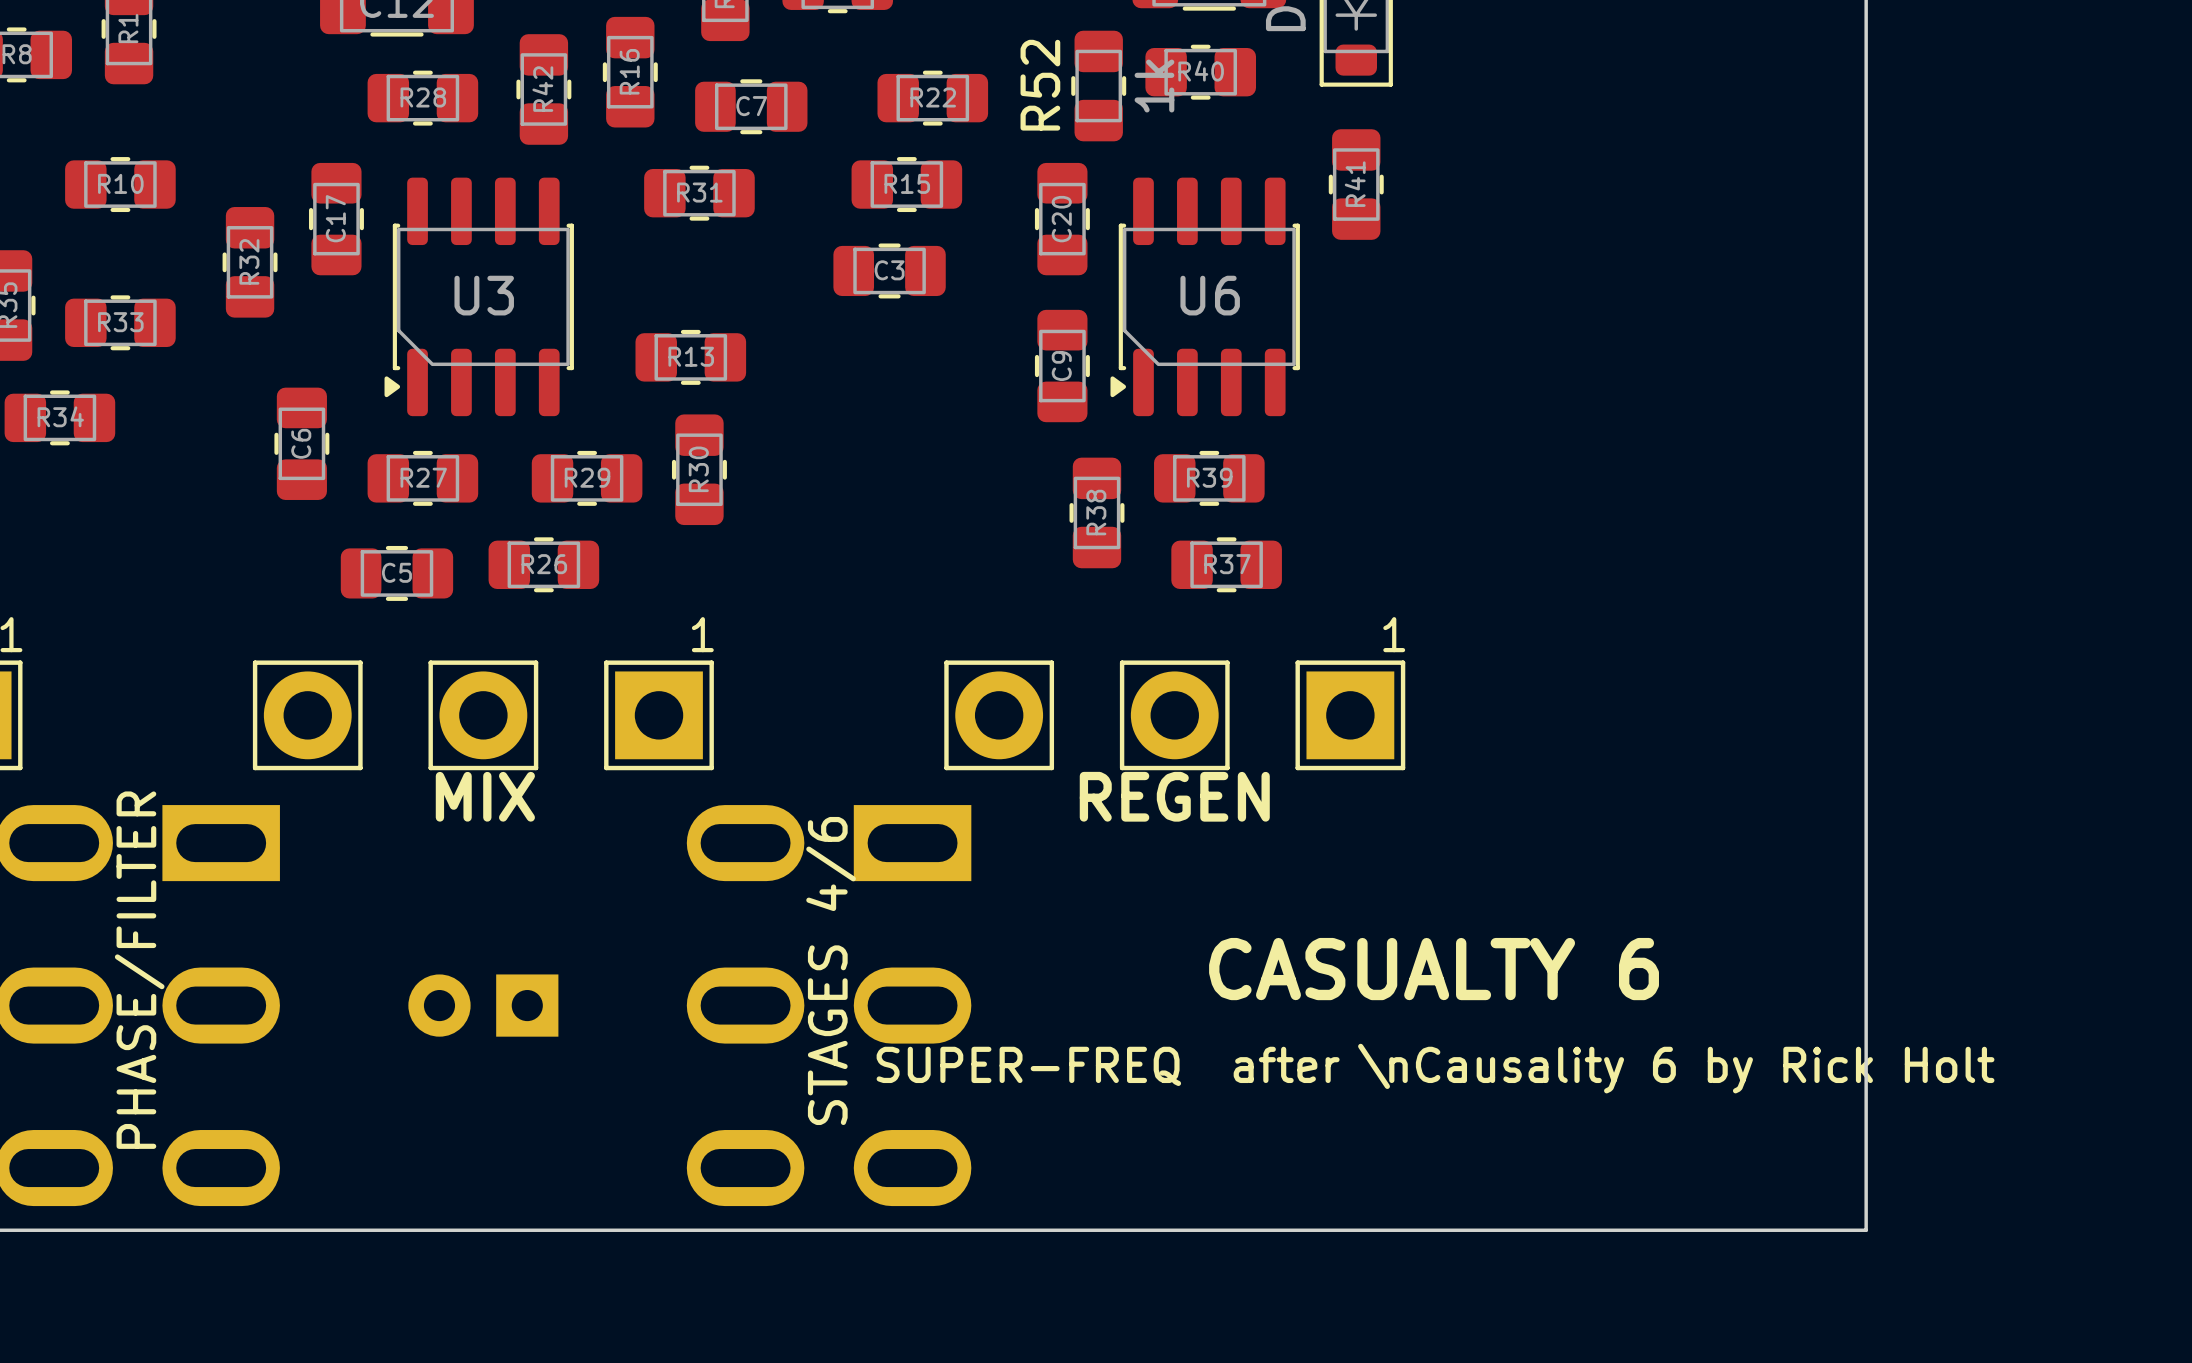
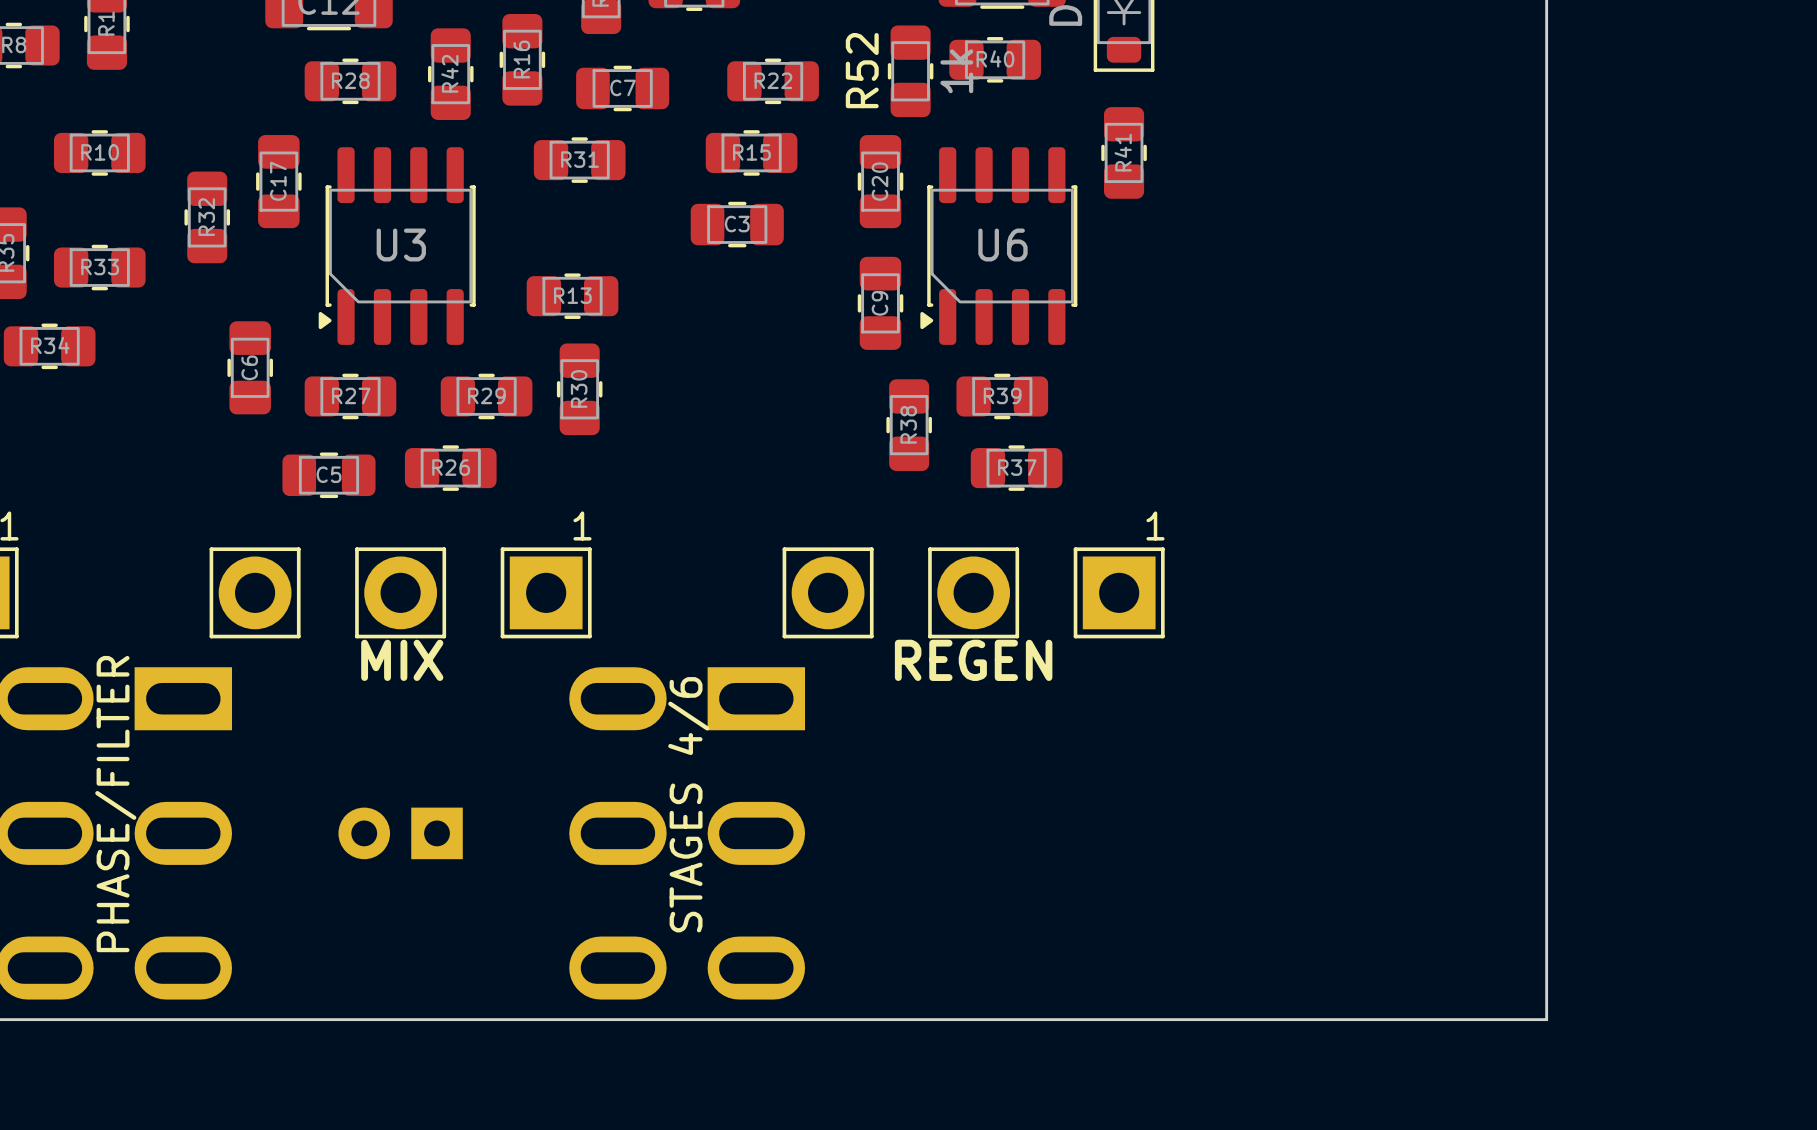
text: CASUALTY 6 (1434, 969) -> none
text: SUPER-FREQ after \nCausality 6 by Rick Holt (1435, 1068) -> none

